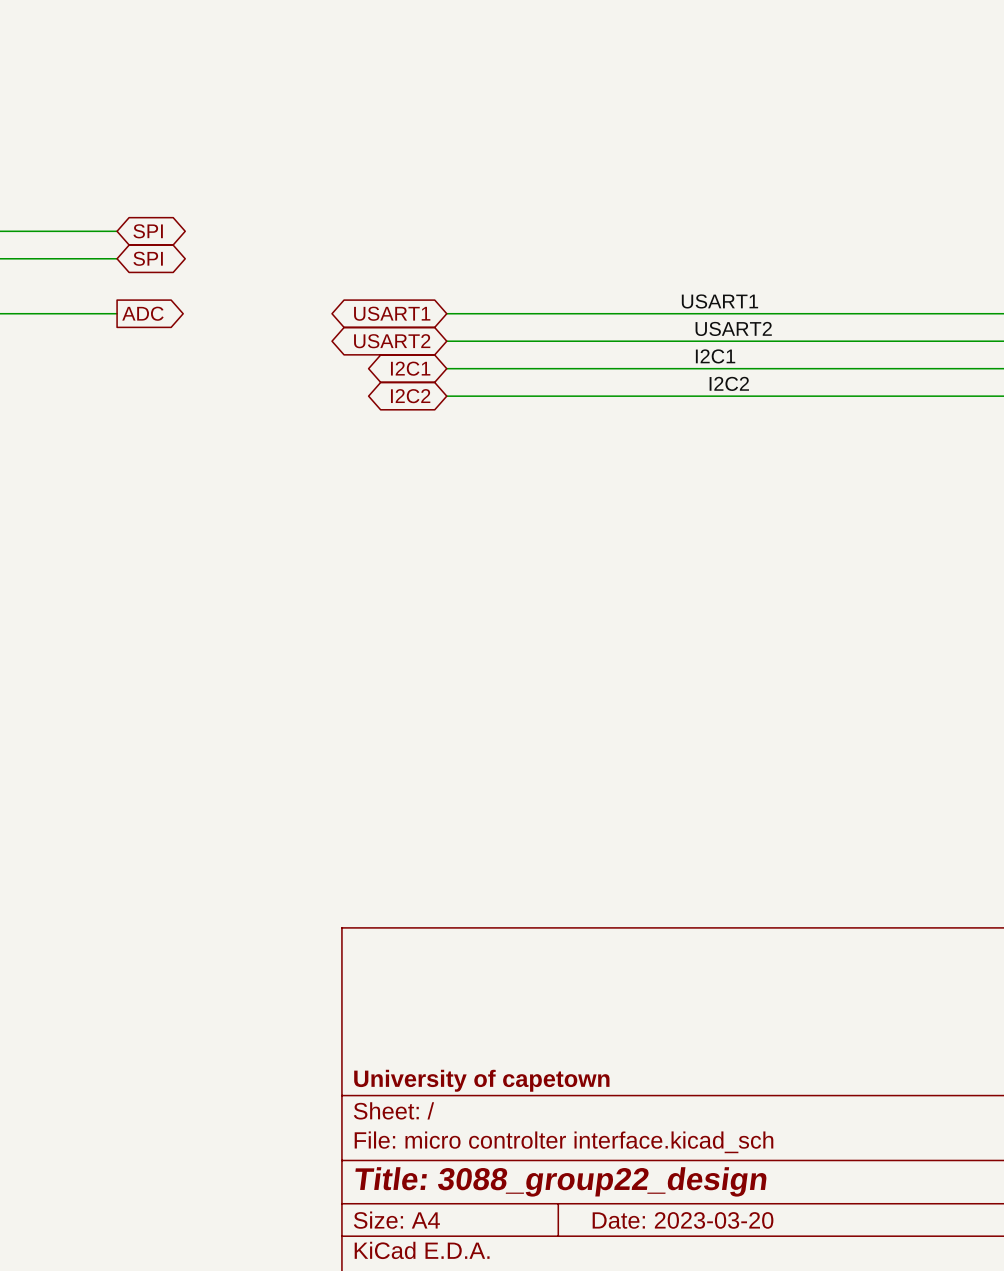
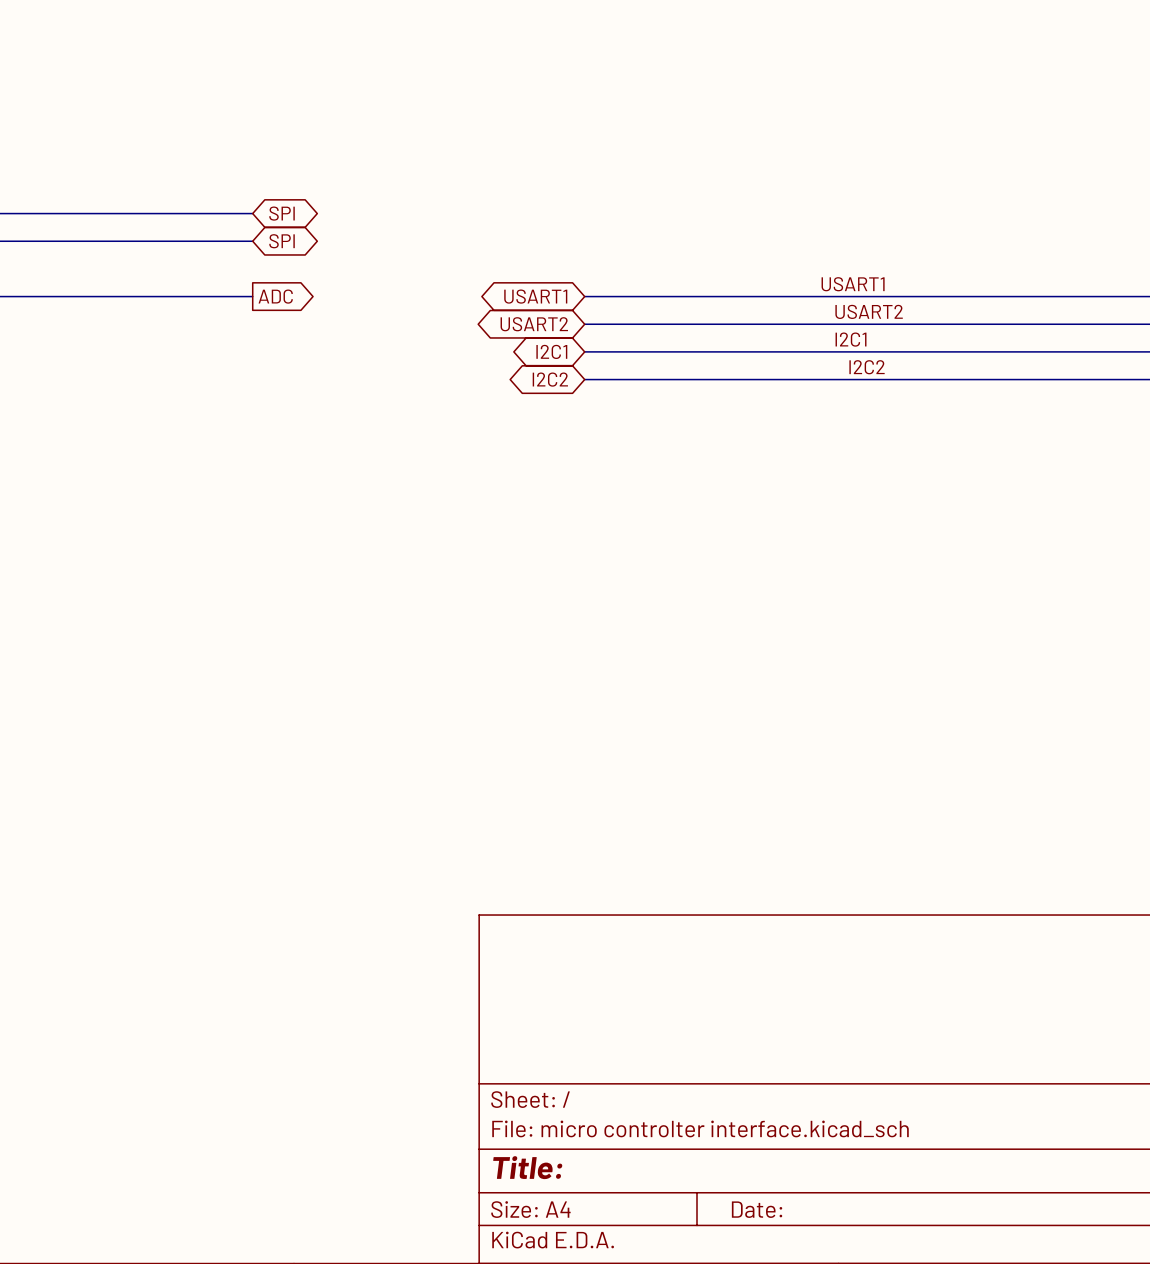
title block: University of capetown (481, 1080) -> none
title block: Title: 3088_group22_design (561, 1181) -> Title: (527, 1167)
title block: Date: 2023-03-20 (683, 1220) -> Date: (757, 1209)

